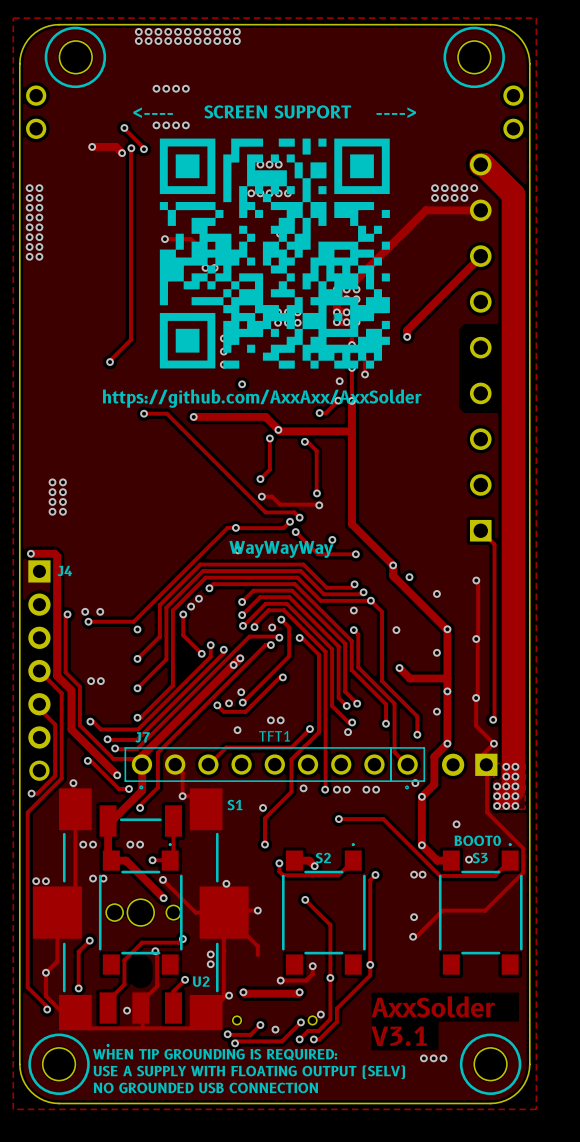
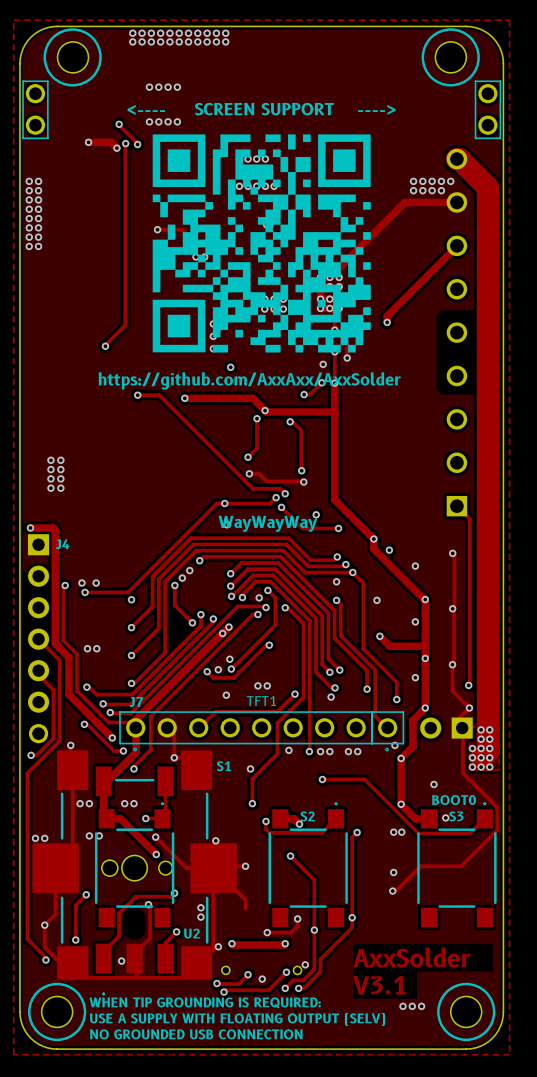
part footprint: [26, 85, 47, 139] -> [22, 80, 49, 139]
part footprint: [503, 85, 524, 139] -> [474, 80, 501, 139]

